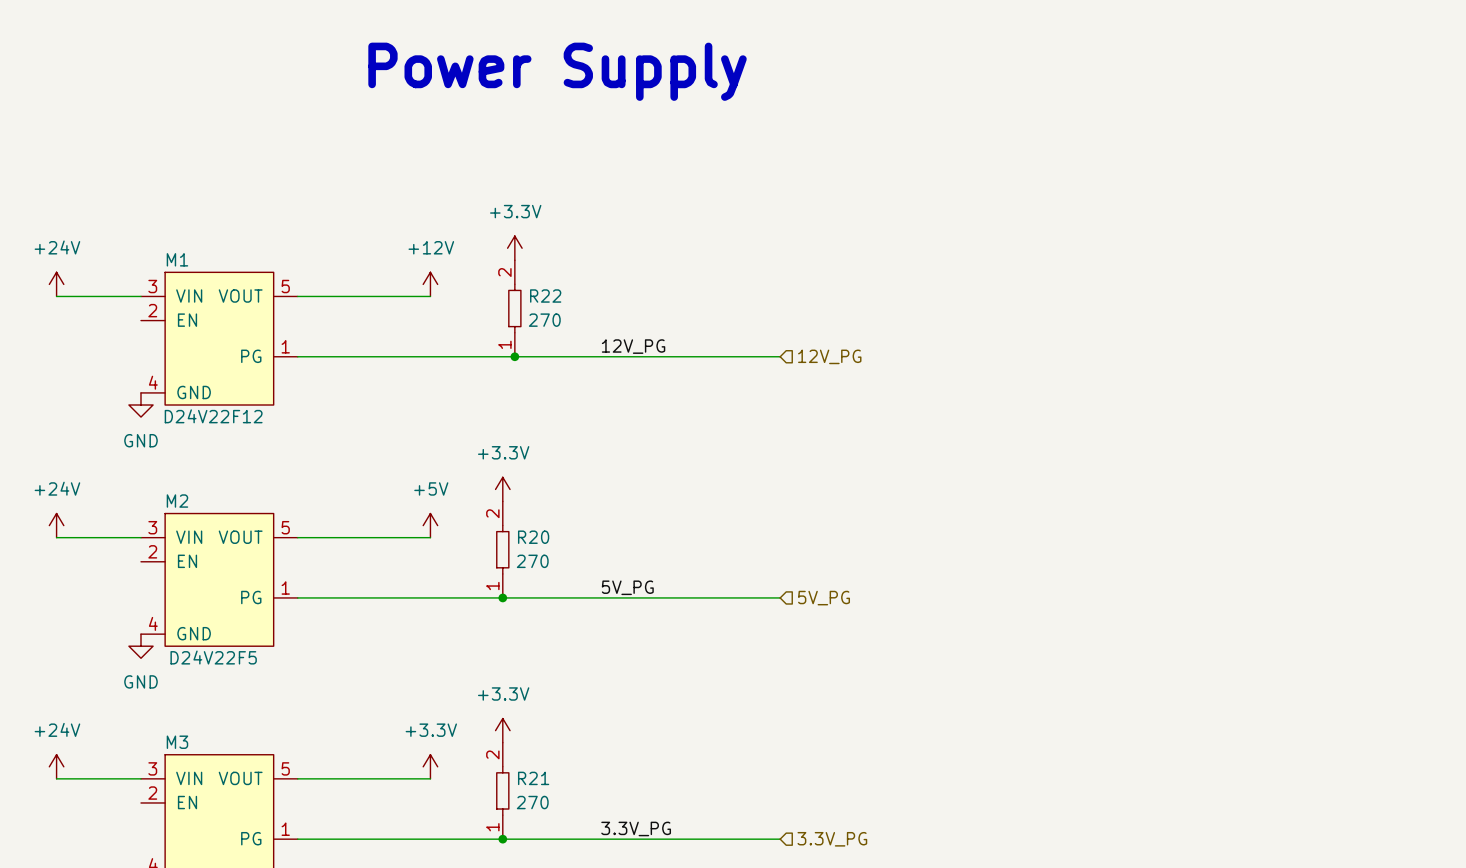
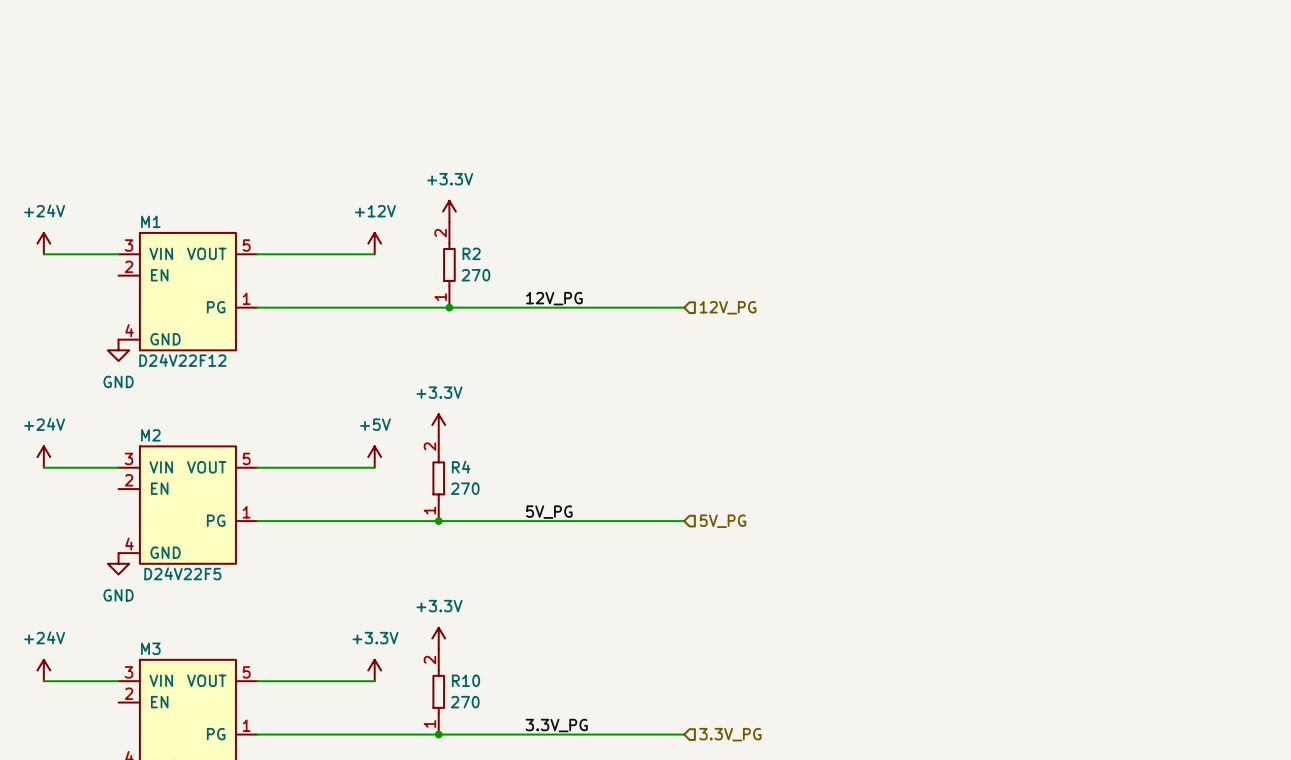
text: Power Supply (557, 71) -> none
R22 name: R22 (545, 296) -> R2 (471, 253)
R20 name: R20 (533, 537) -> R4 (461, 467)
R21 name: R21 (533, 778) -> R10 (466, 680)

